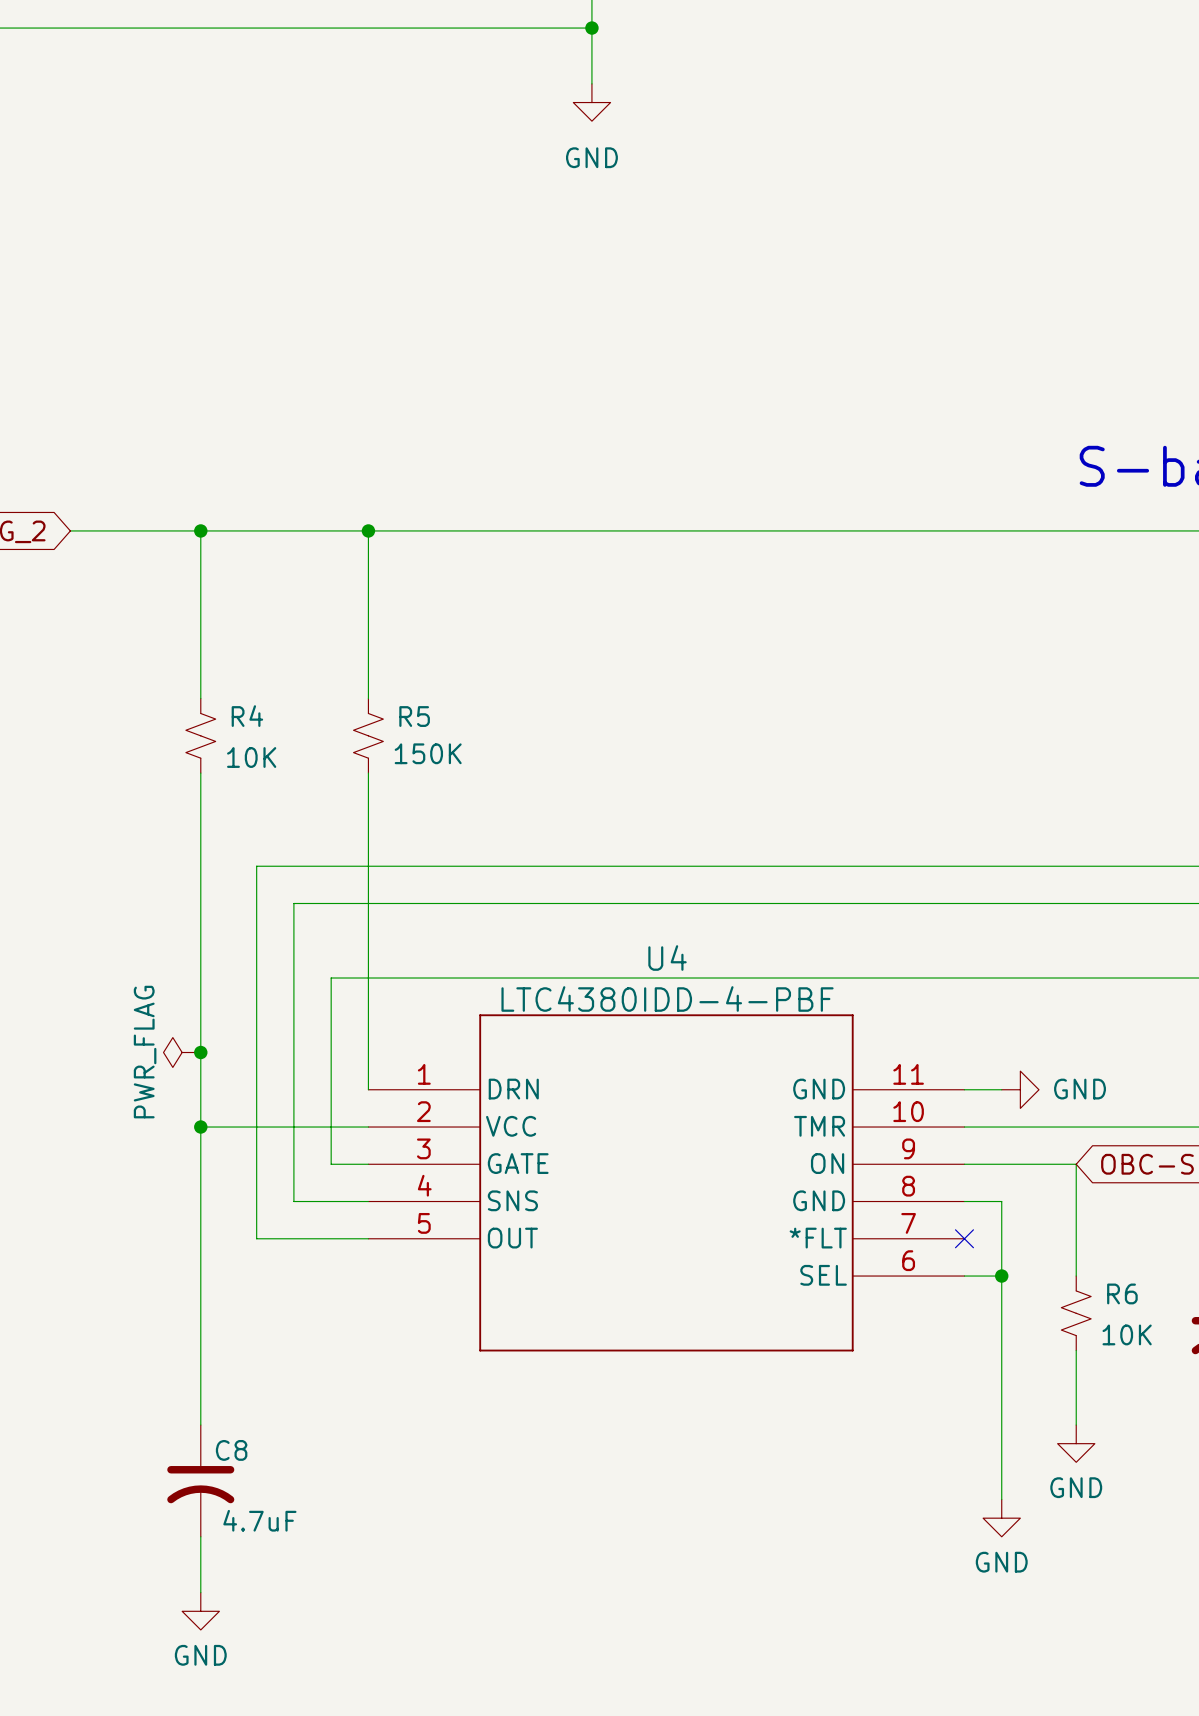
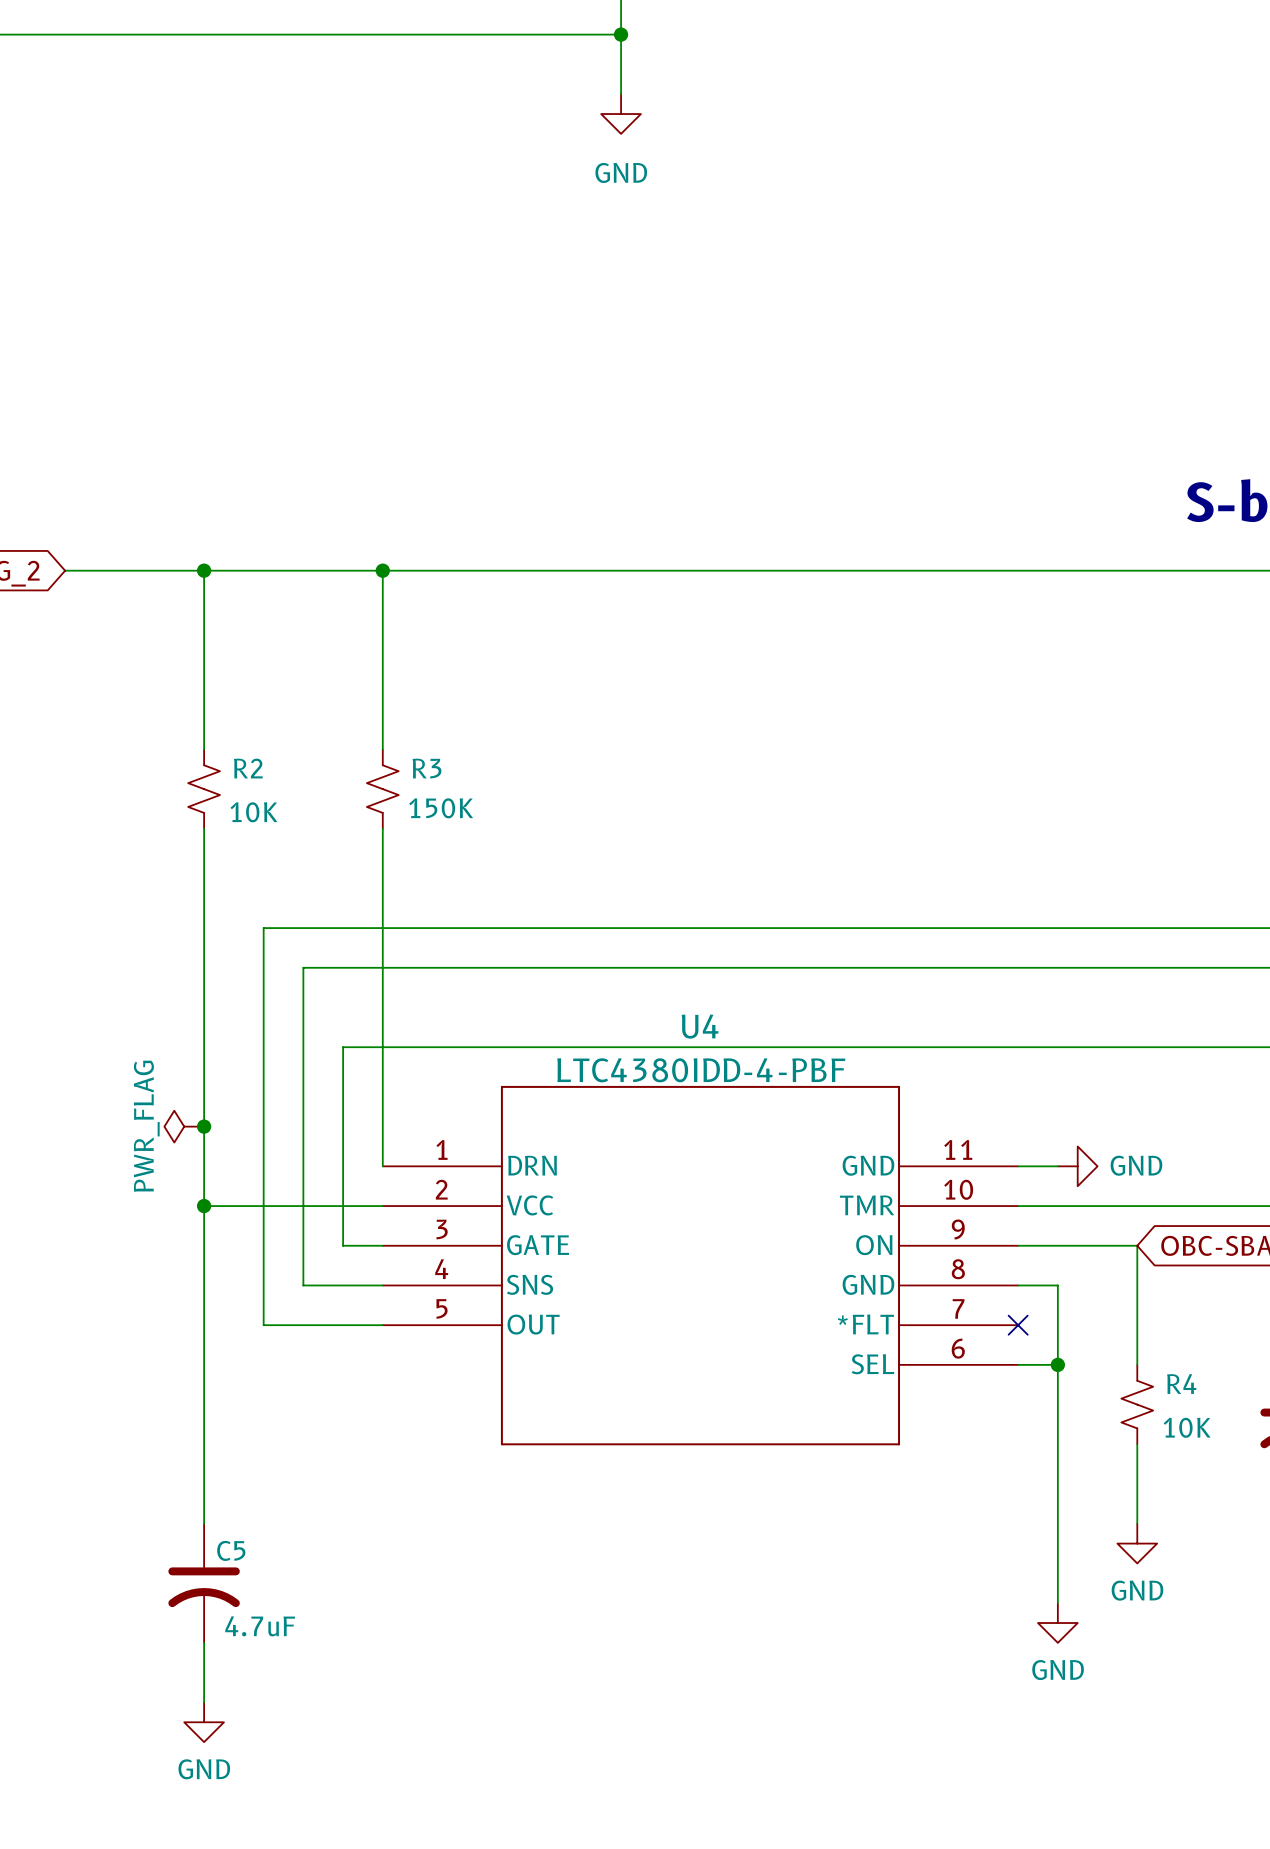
R4 name: R4 (247, 716) -> R2 (248, 768)
R5 name: R5 (414, 716) -> R3 (427, 768)
R6 name: R6 (1122, 1293) -> R4 (1181, 1384)
C8 name: C8 (231, 1450) -> C5 (231, 1550)

